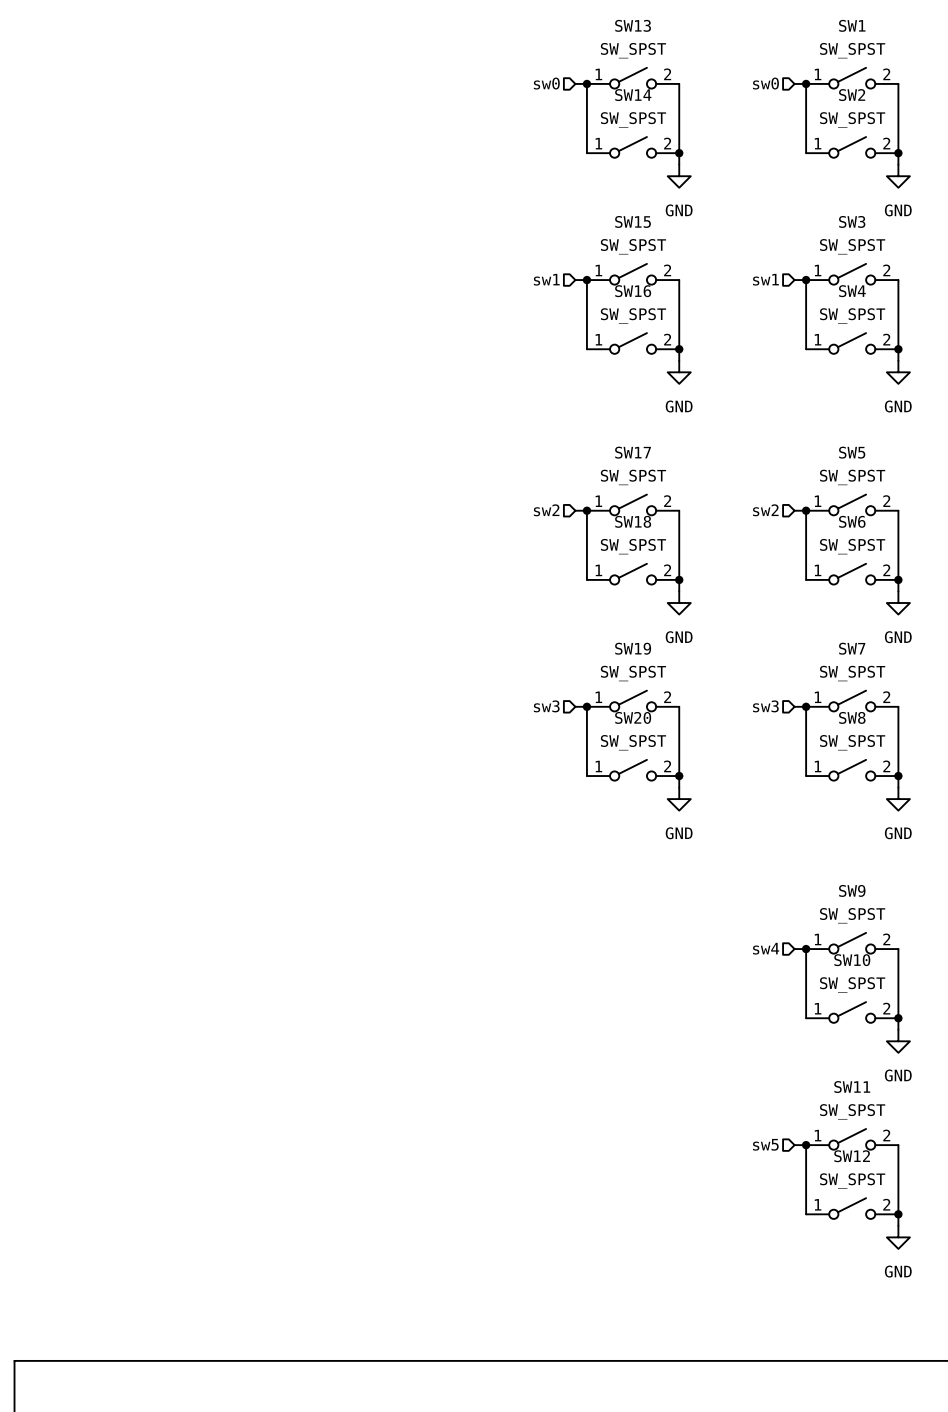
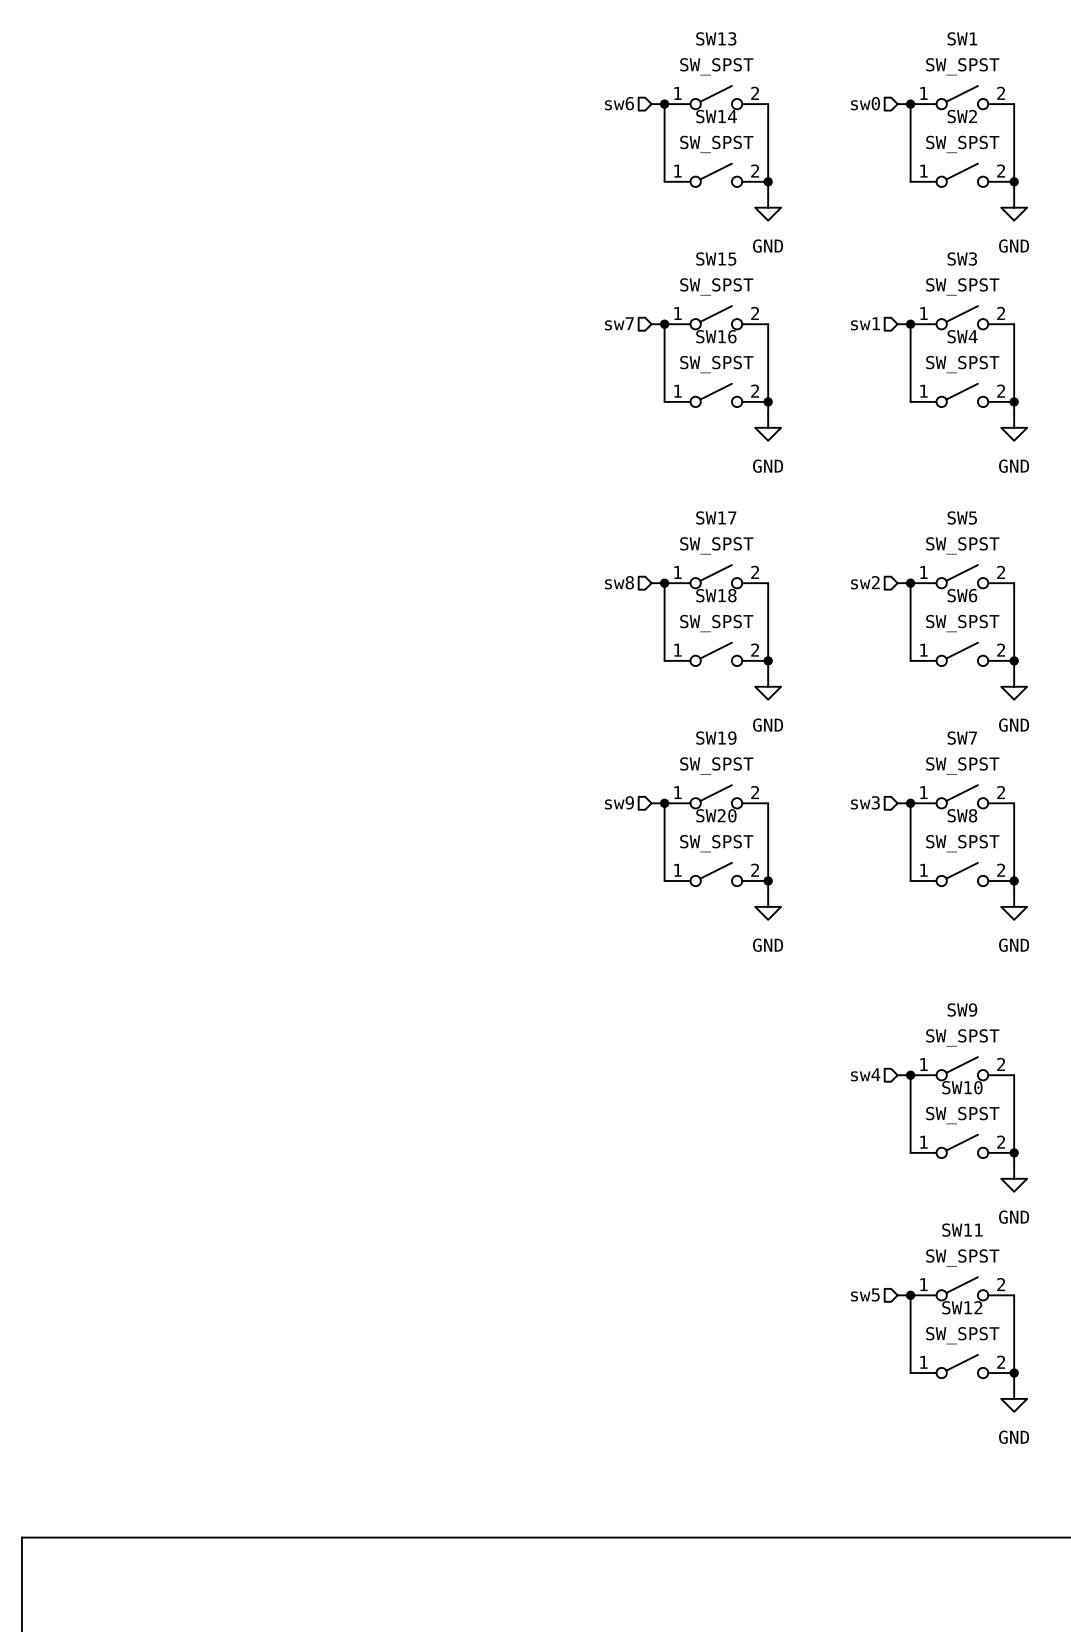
hierarchical label: sw0 (546, 83) -> sw6 (619, 103)
hierarchical label: sw1 (546, 279) -> sw7 (619, 323)
hierarchical label: sw2 (546, 510) -> sw8 (619, 582)
hierarchical label: sw3 (546, 706) -> sw9 (619, 802)

